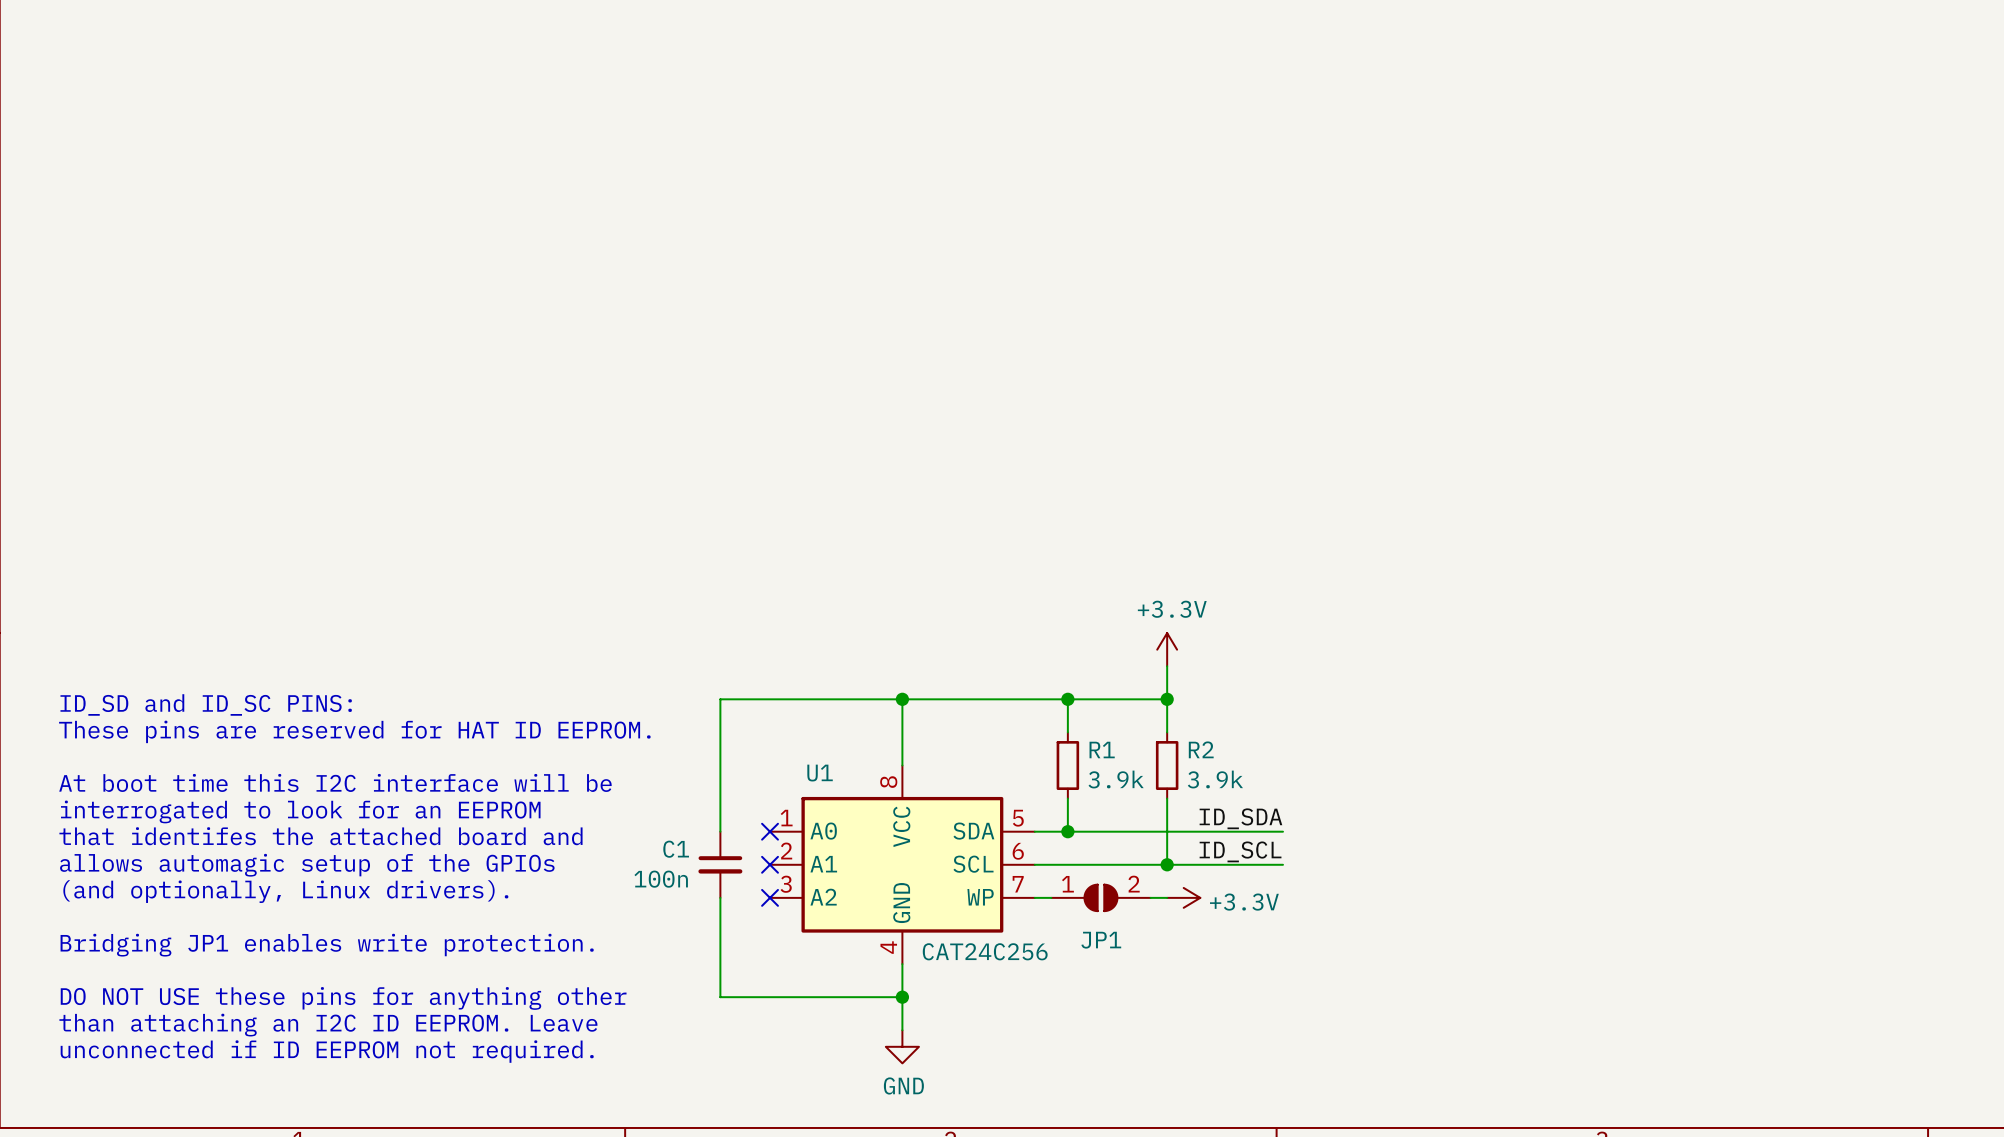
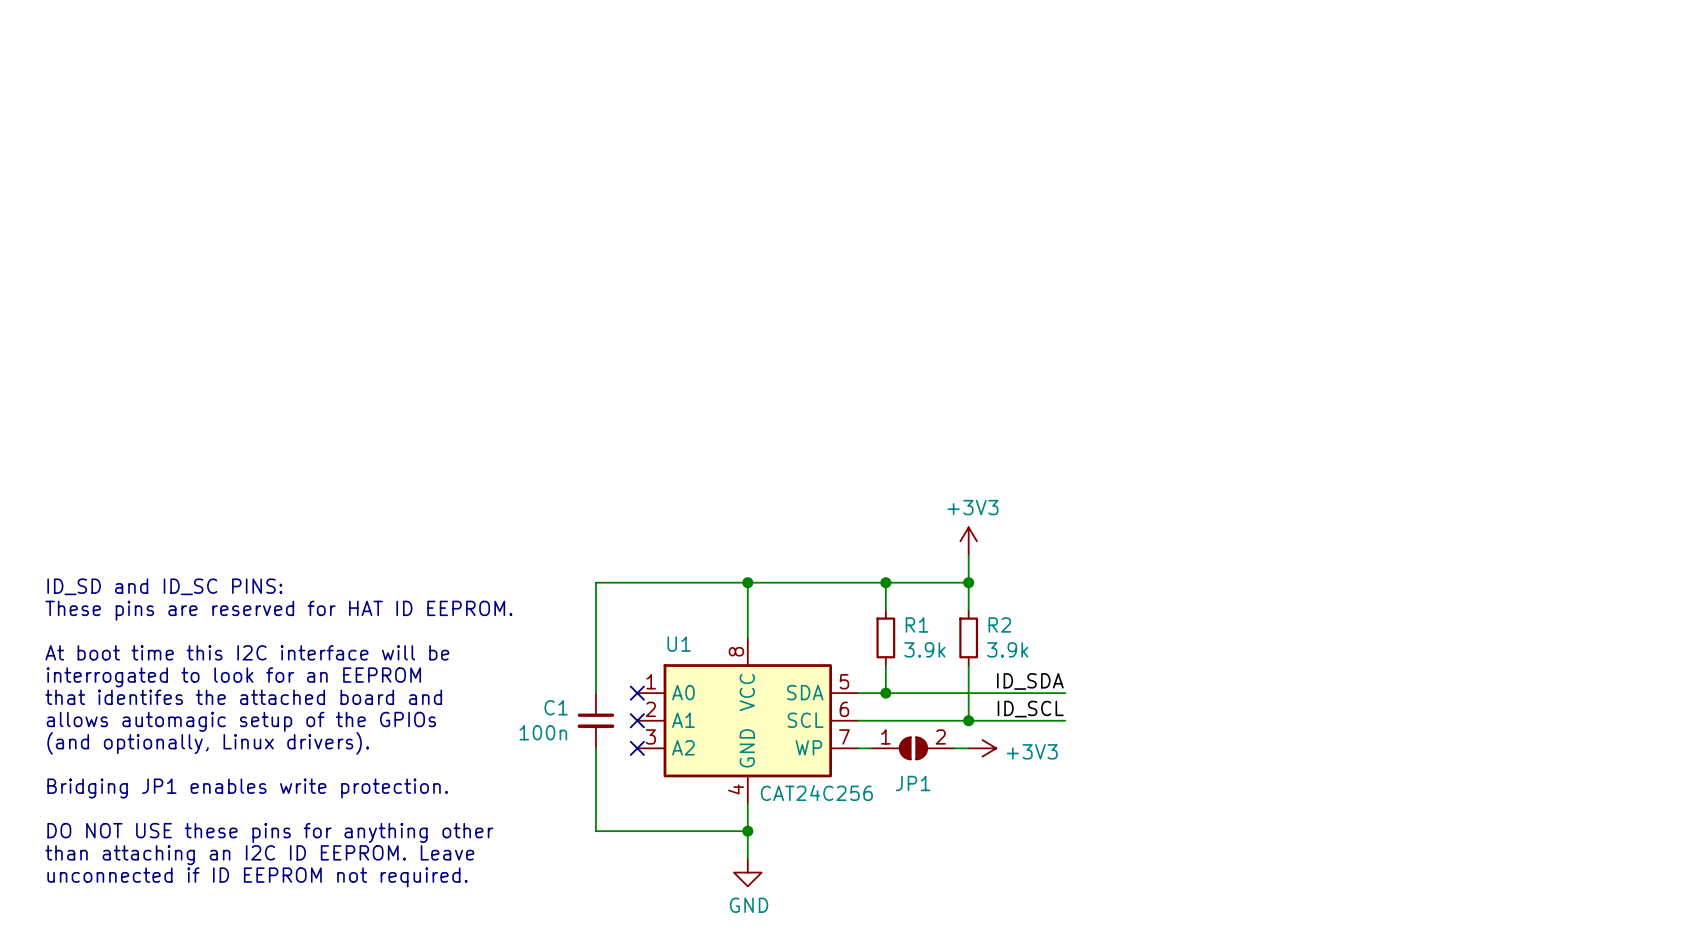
power symbol: +3.3V (1167, 649) -> +3V3 (968, 541)
power symbol: +3.3V (1183, 897) -> +3V3 (982, 748)

